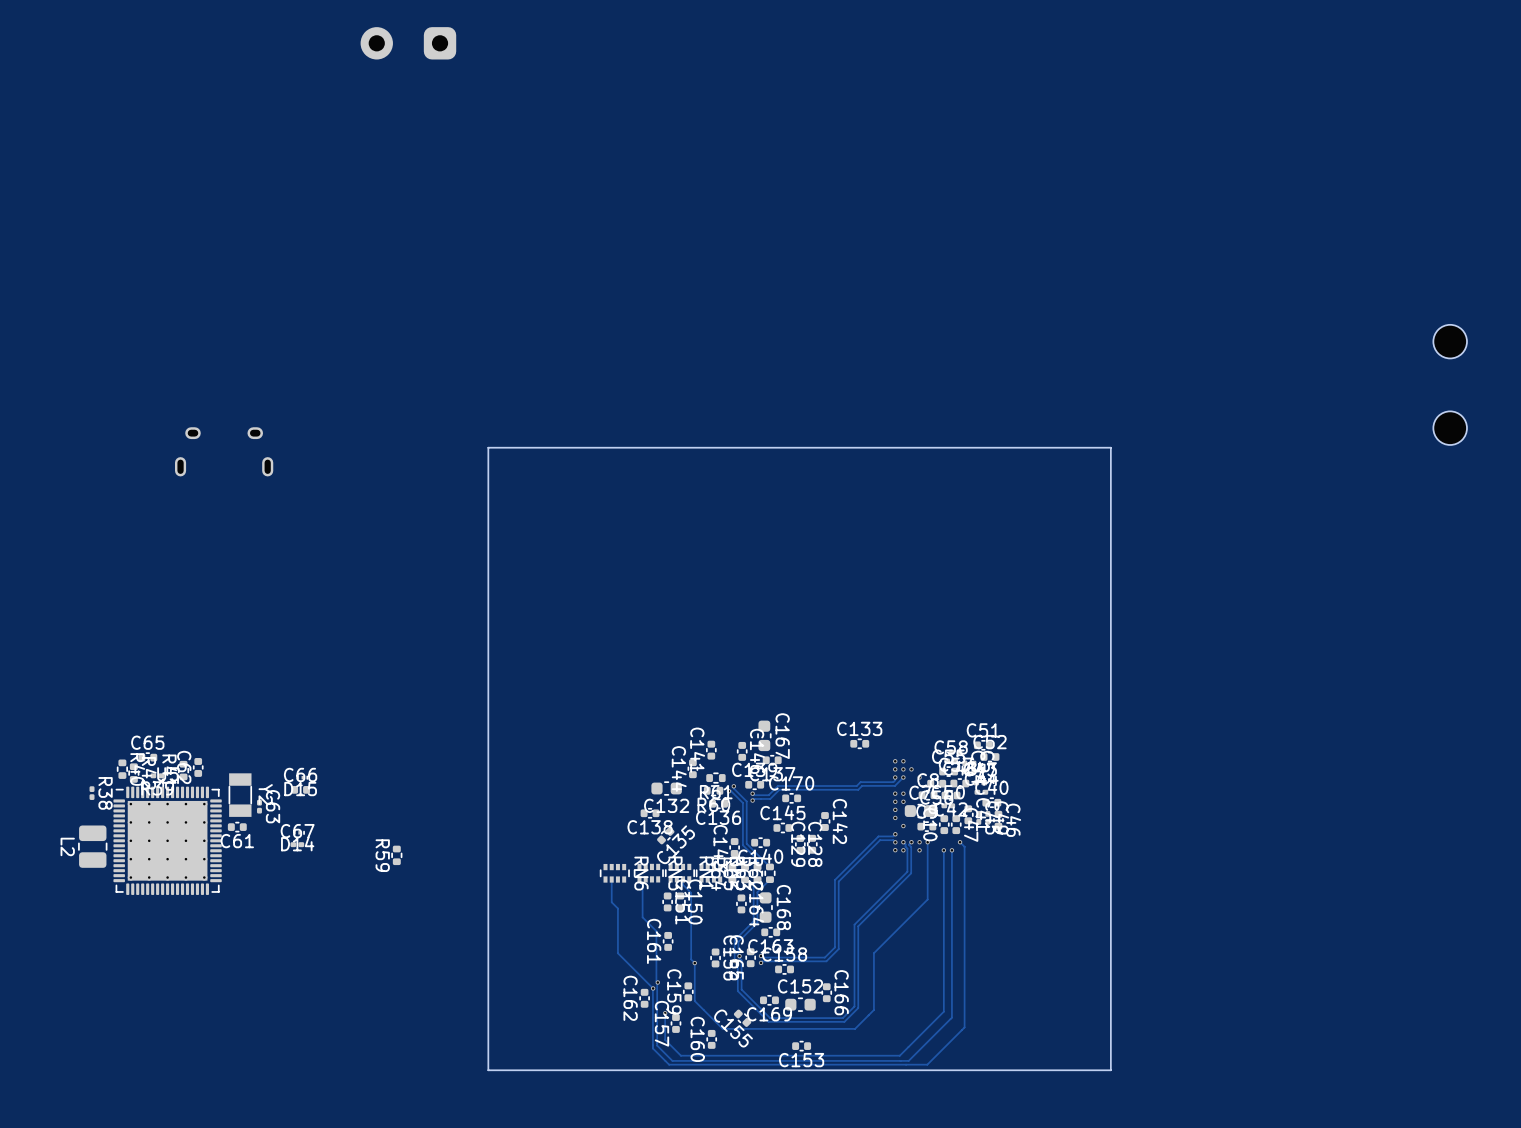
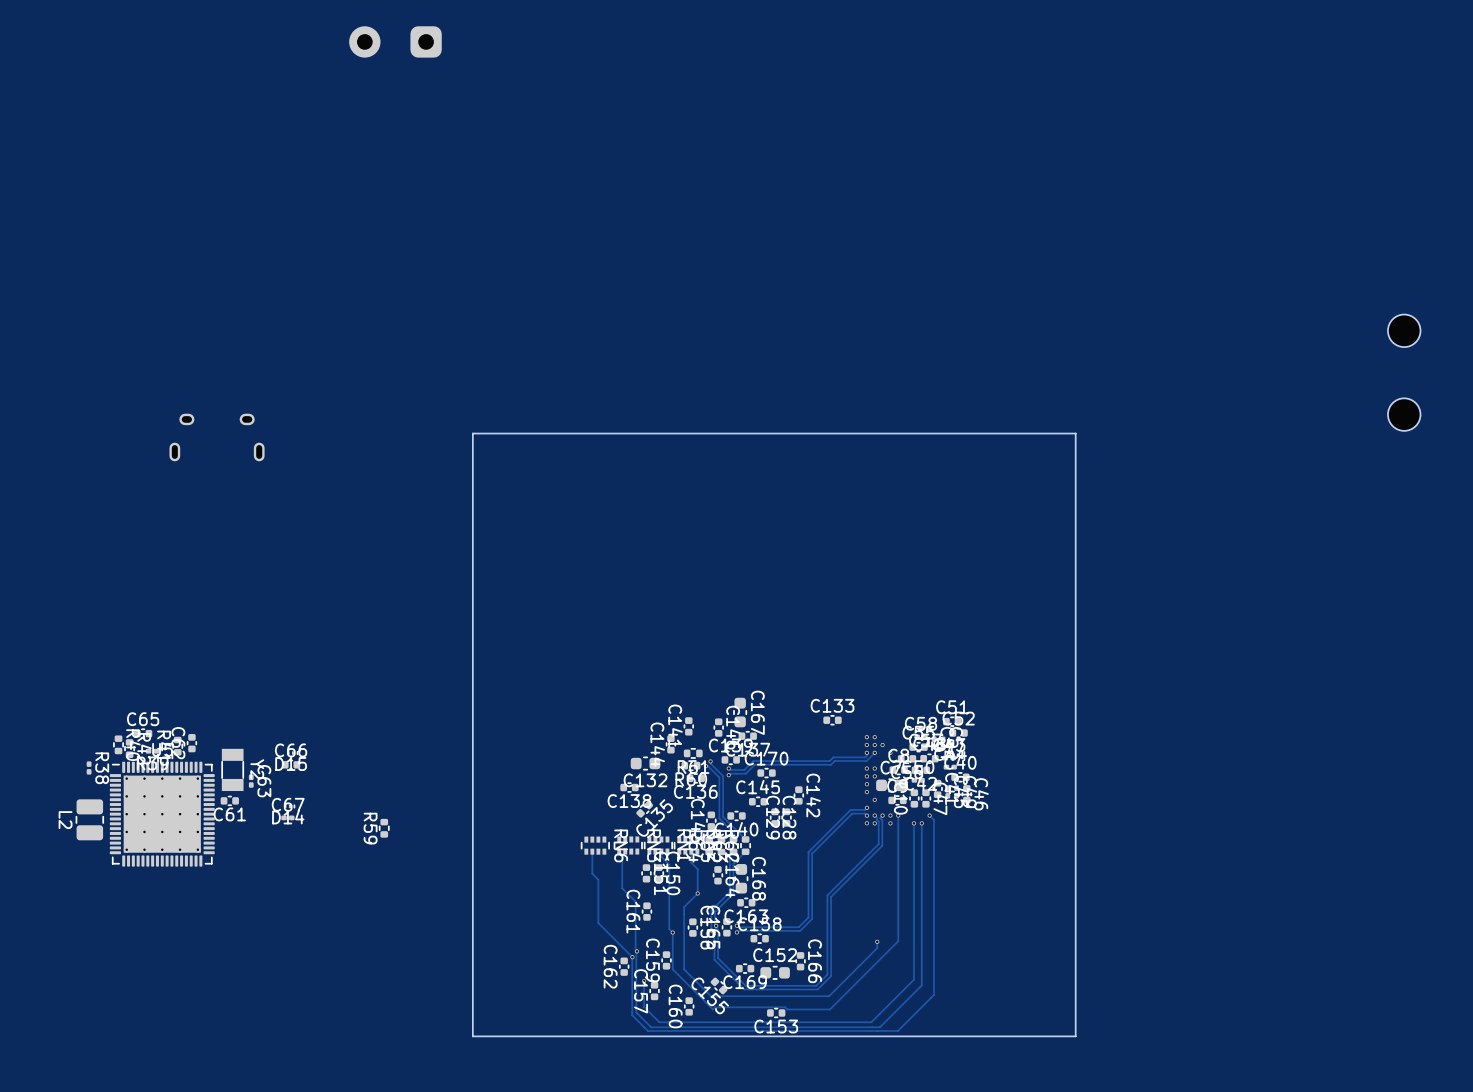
track: none -> (691, 851) (691, 862) (697, 869) (697, 893) (684, 907) (684, 969) (710, 996) (829, 996) (877, 948) (877, 941)
track: (927, 899) (873, 953) (873, 1010) (855, 1028) (722, 1028) -> (898, 871) (898, 941) (829, 1009) (787, 1009) (785, 1007) (715, 1007) (712, 1009) (699, 996)
via: none -> (697, 893)
via: none -> (877, 941)

